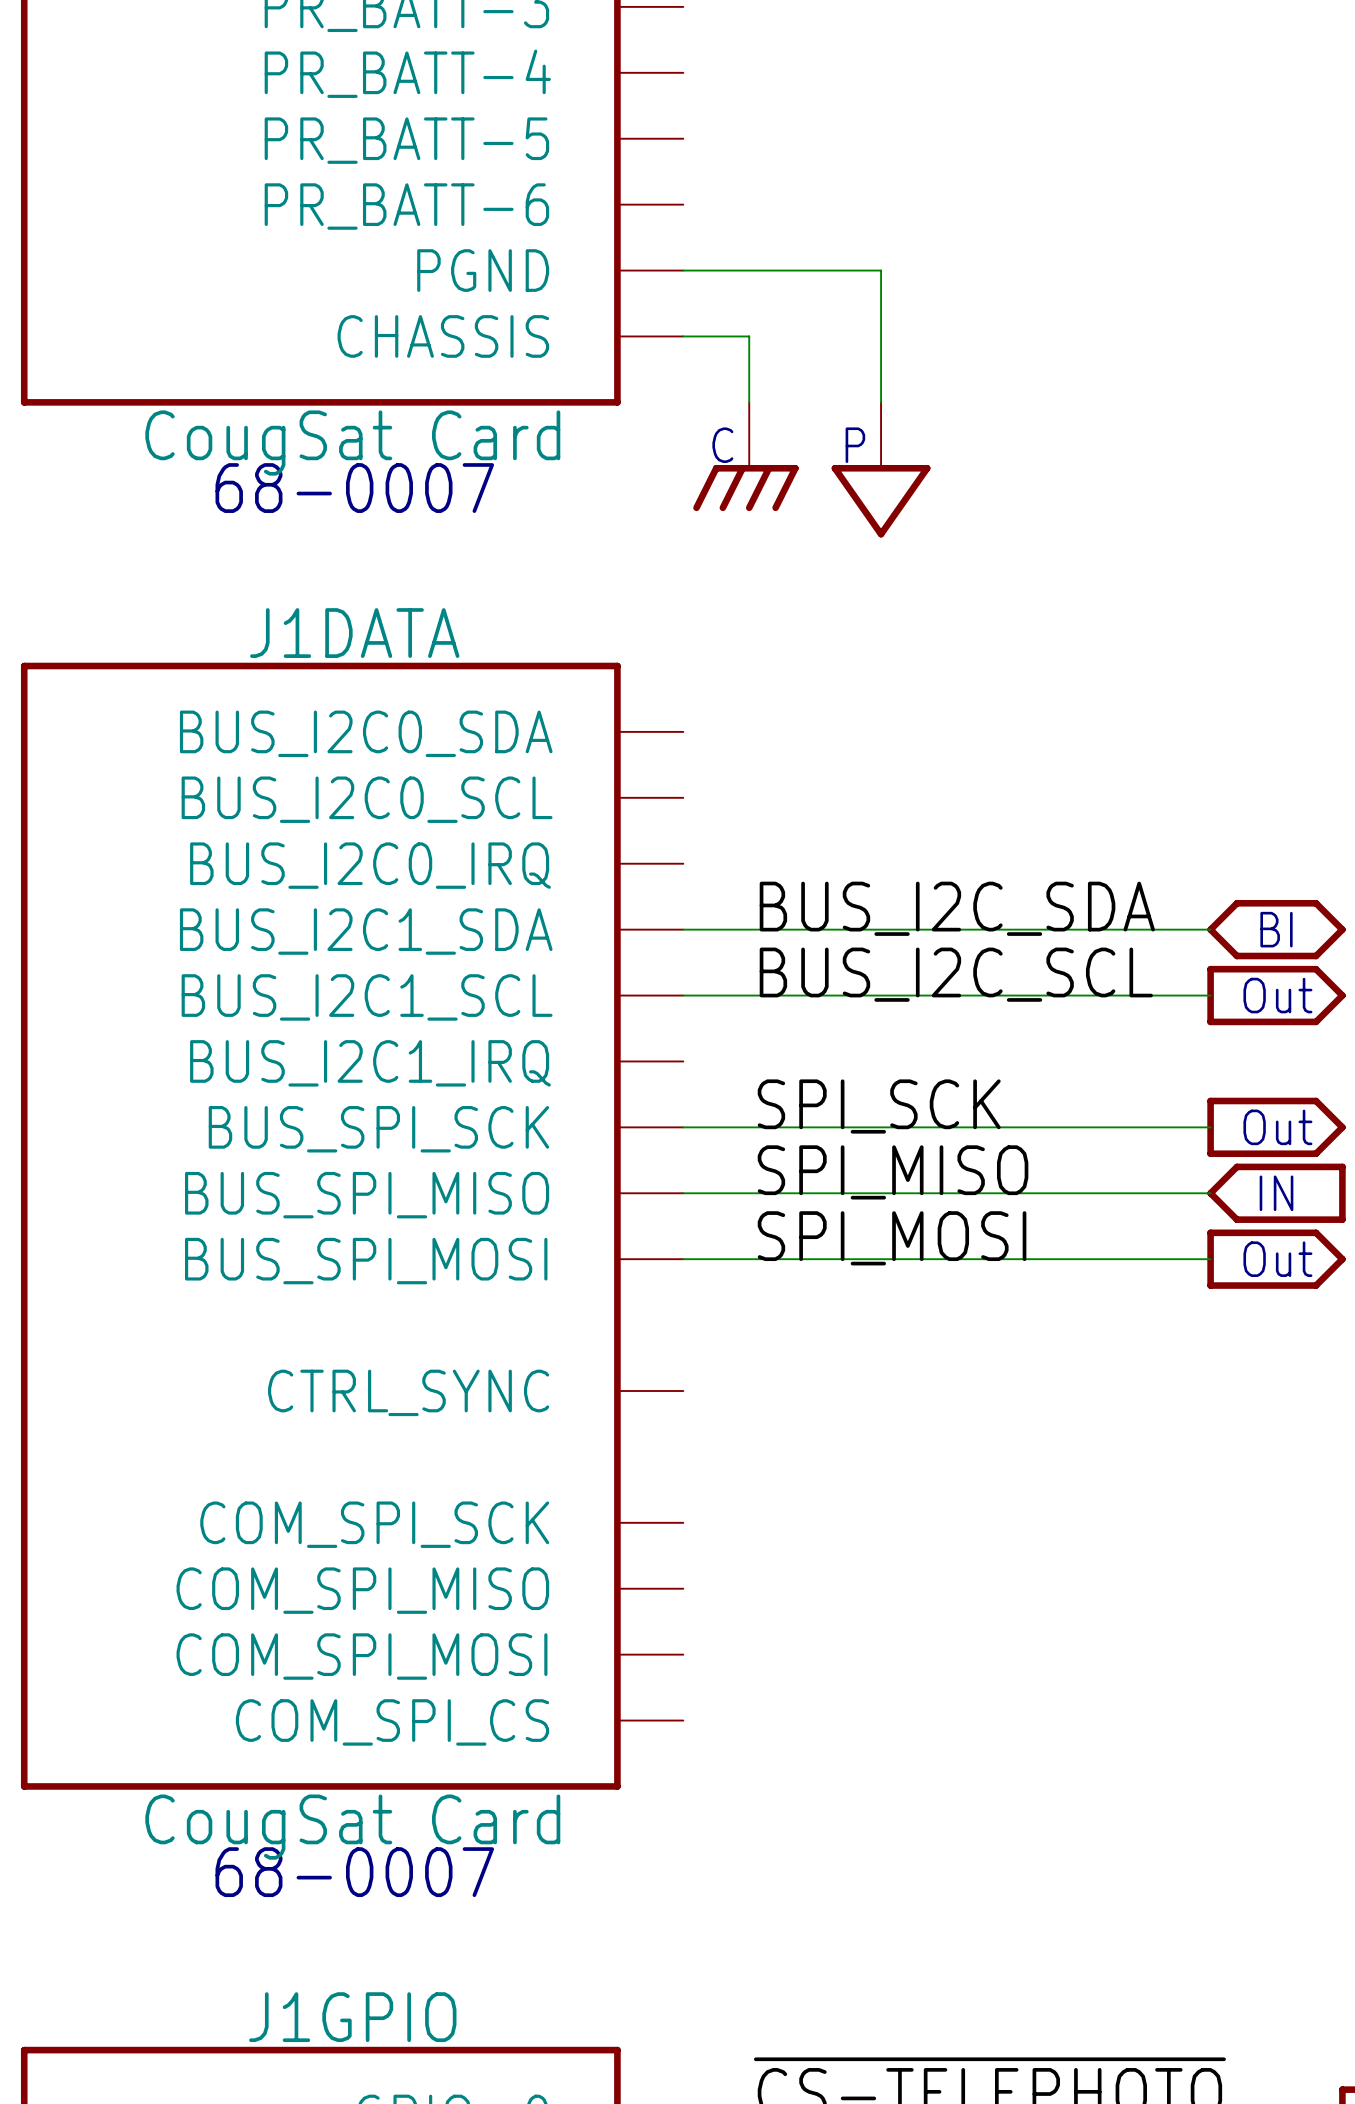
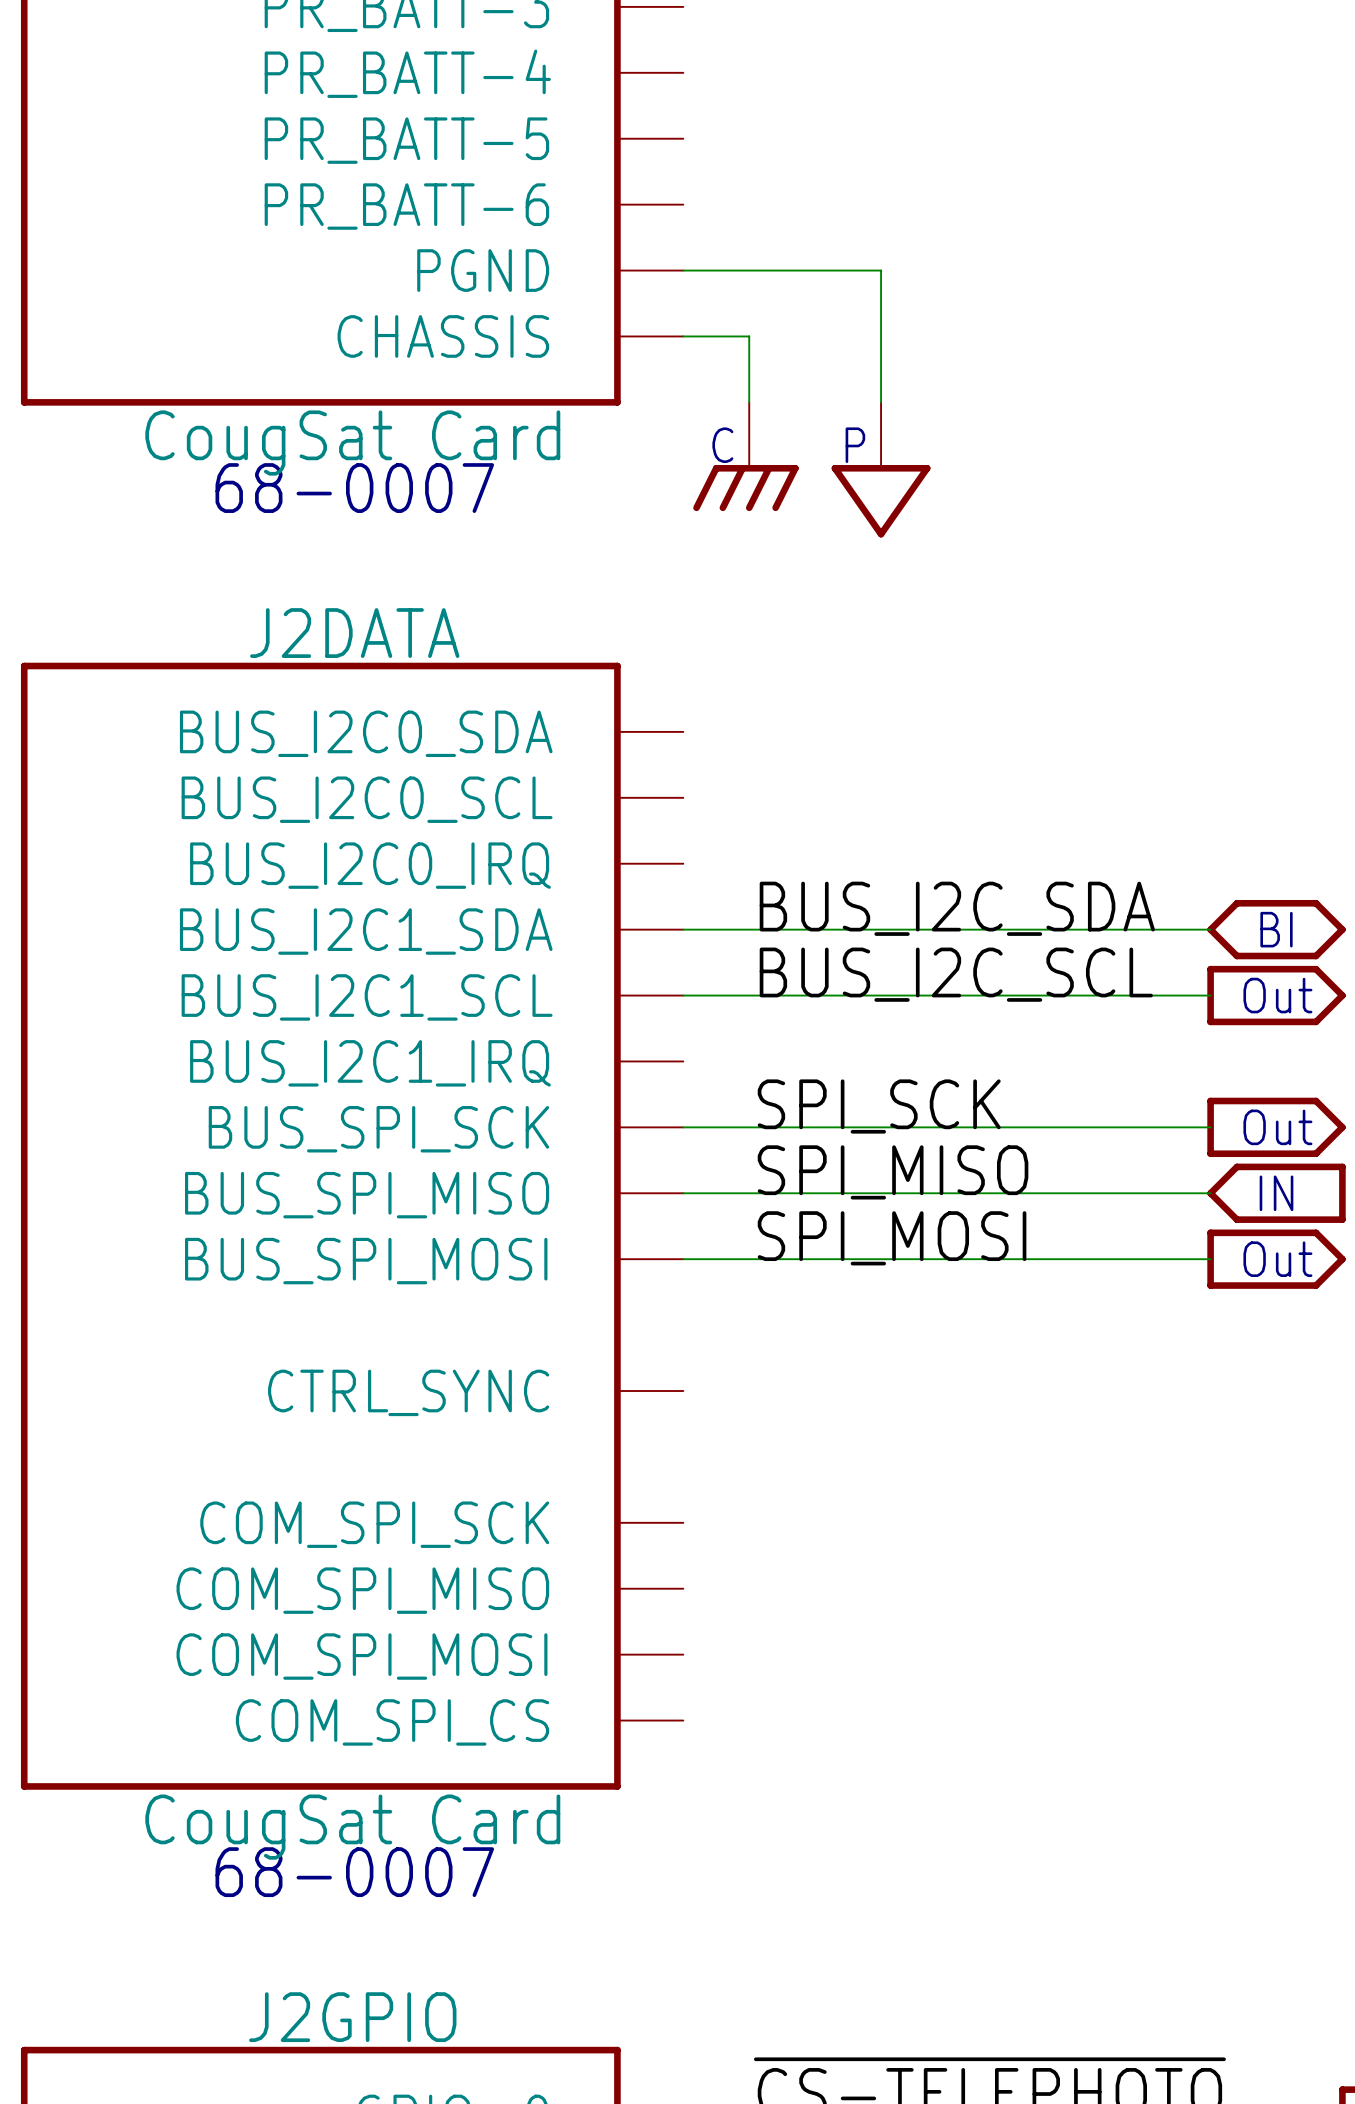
J1DATA name: J1DATA (354, 633) -> J2DATA (354, 633)
J1GPIO name: J1GPIO (352, 2017) -> J2GPIO (352, 2017)

